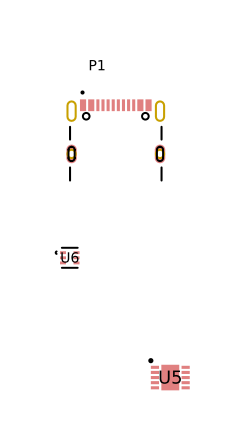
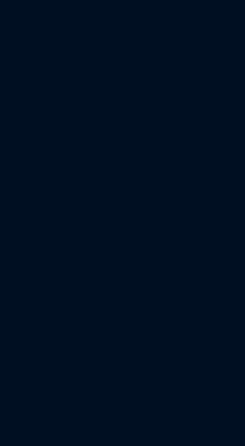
P1: (115, 136) -> none
U6: (67, 257) -> none
U5: (169, 374) -> none

